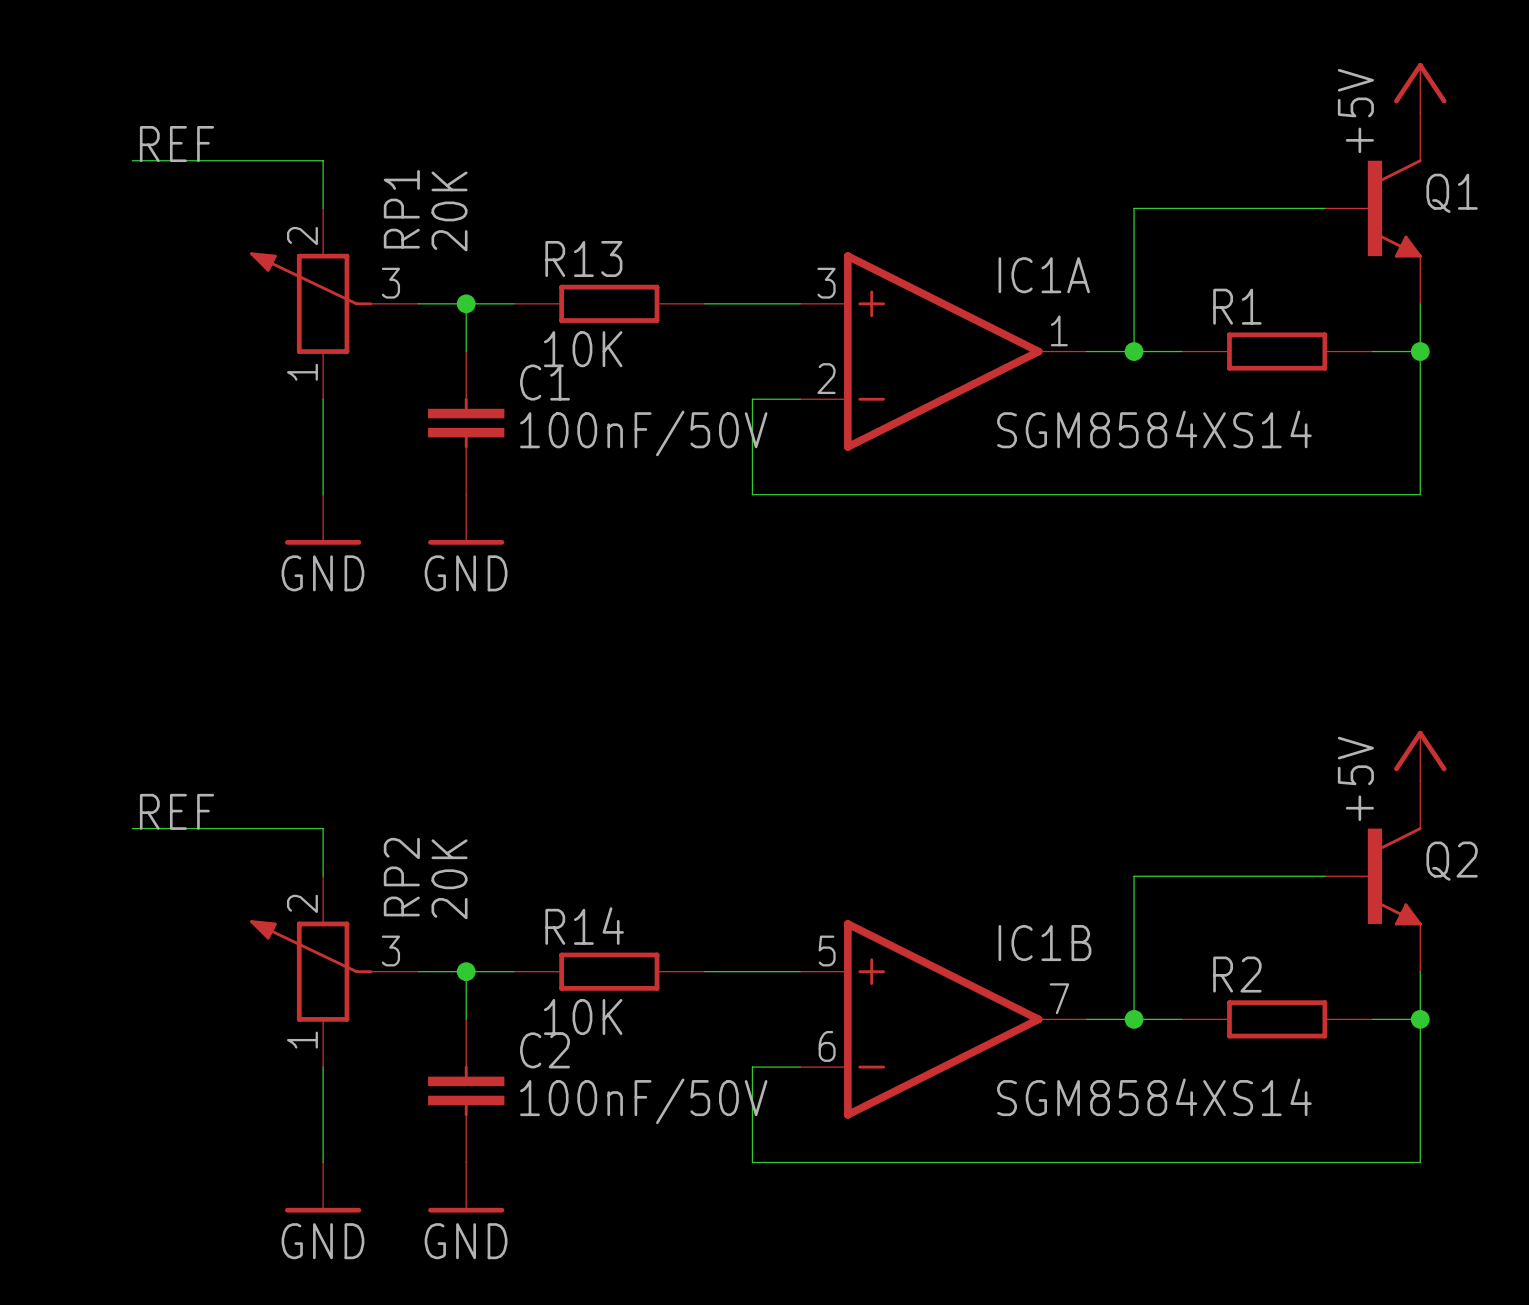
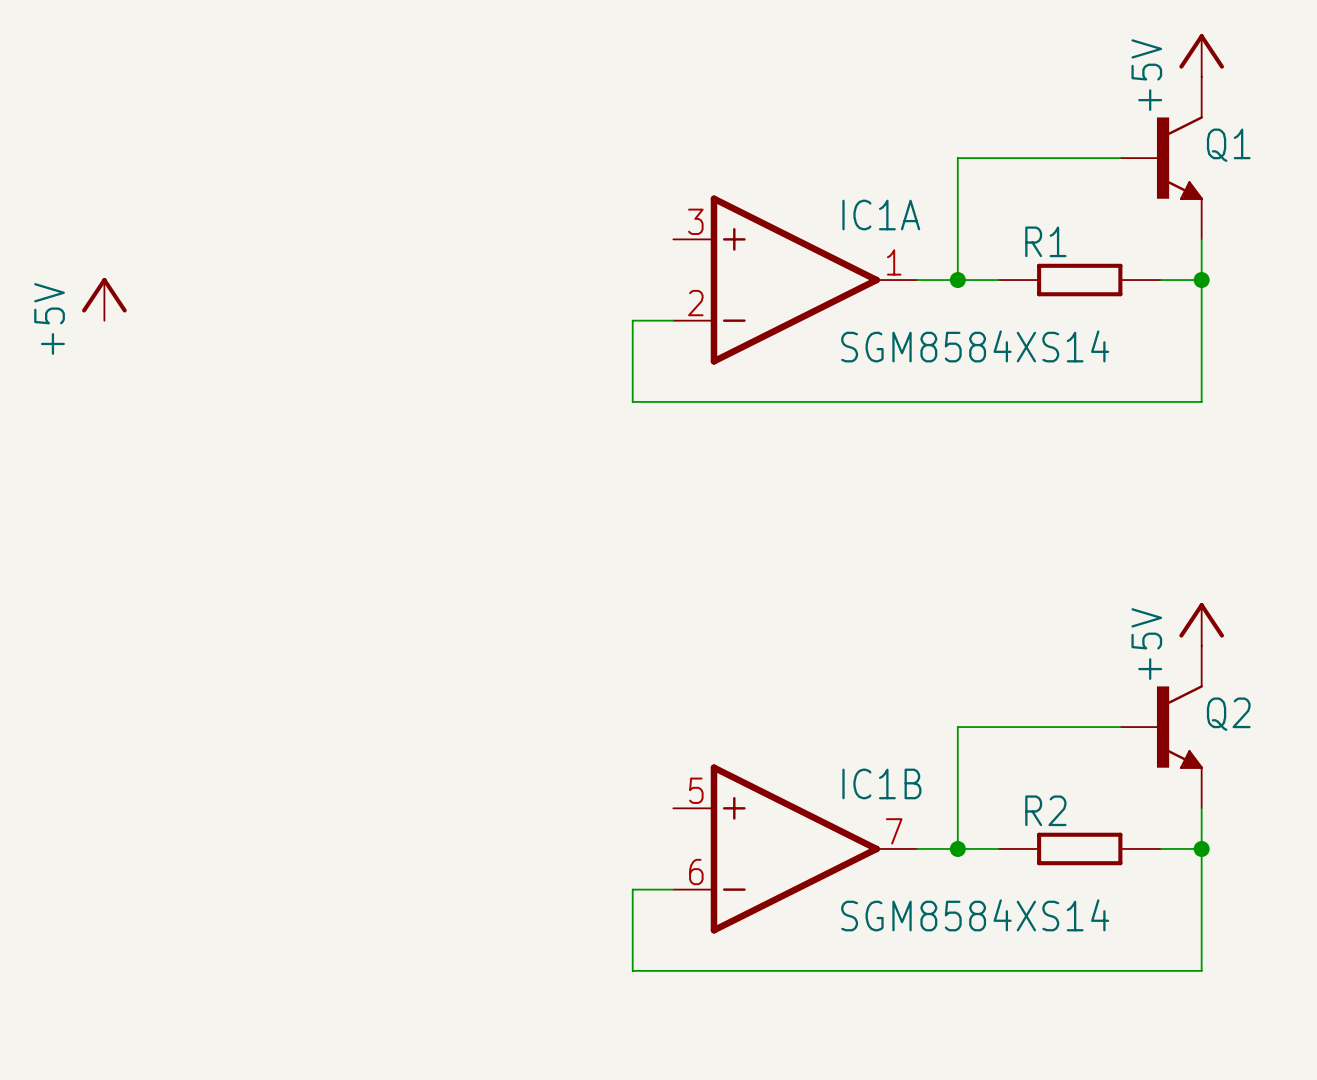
label: REF (176, 144) -> none
wire: (132, 160) (323, 160) (323, 208) -> none
RP1: 20K (334, 303) -> none
wire: (418, 303) (513, 303) -> none
wire: (466, 303) (466, 351) -> none
junction: (466, 303) -> none
R13: 10K (609, 303) -> none
wire: (704, 303) (800, 303) -> none
power symbol: none -> +5V (104, 299)
wire: (323, 399) (323, 494) -> none
C1: 100nF/50V (466, 423) -> none
power symbol: GND (323, 519) -> none
power symbol: GND (466, 519) -> none
label: REF (176, 811) -> none
wire: (132, 828) (323, 828) (323, 876) -> none
RP2: 20K (334, 971) -> none
wire: (418, 971) (513, 971) -> none
wire: (466, 971) (466, 1019) -> none
junction: (466, 971) -> none
R14: 10K (609, 971) -> none
wire: (704, 971) (800, 971) -> none
wire: (323, 1067) (323, 1162) -> none
C2: 100nF/50V (466, 1090) -> none
power symbol: GND (323, 1187) -> none
power symbol: GND (466, 1187) -> none

